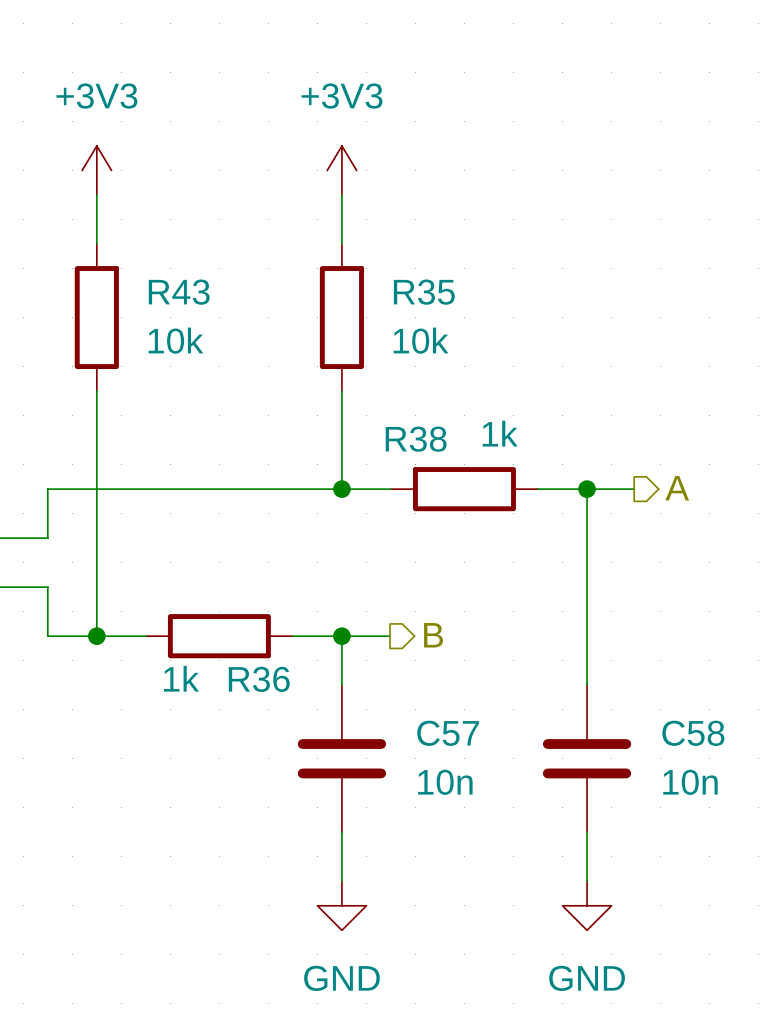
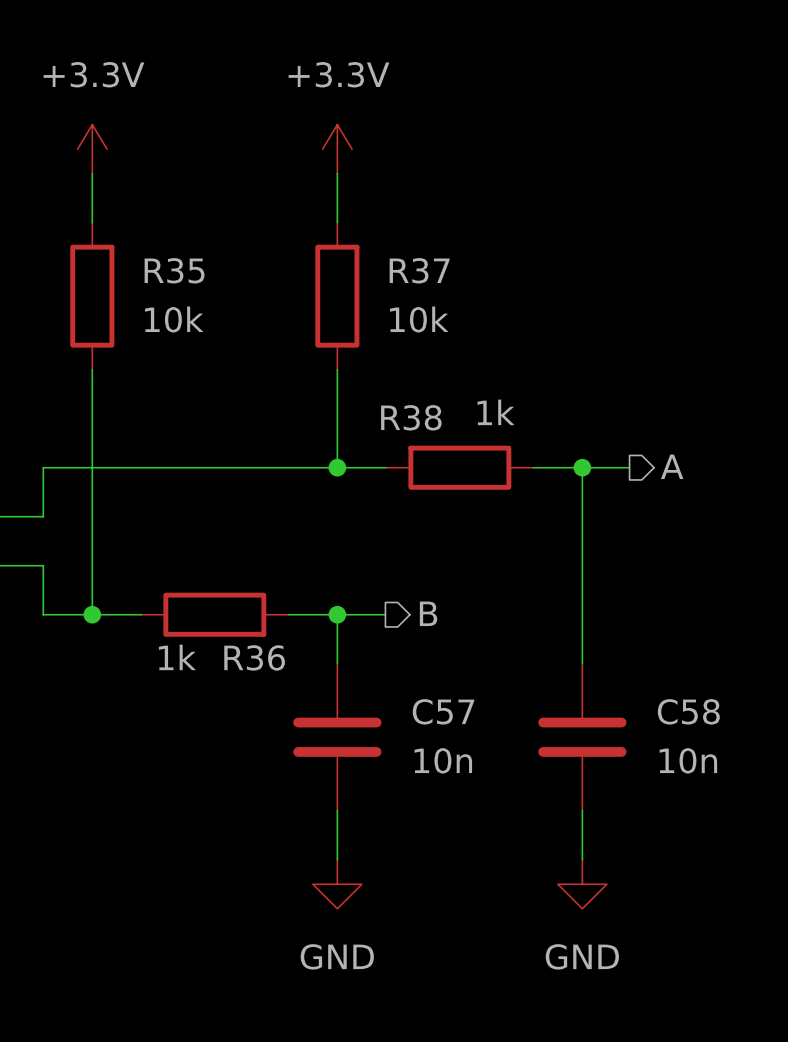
power symbol: +3V3 (96, 170) -> +3.3V (92, 149)
power symbol: +3V3 (341, 170) -> +3.3V (337, 149)
R43 name: R43 (179, 292) -> R35 (174, 270)
R35 name: R35 (424, 292) -> R37 (419, 270)

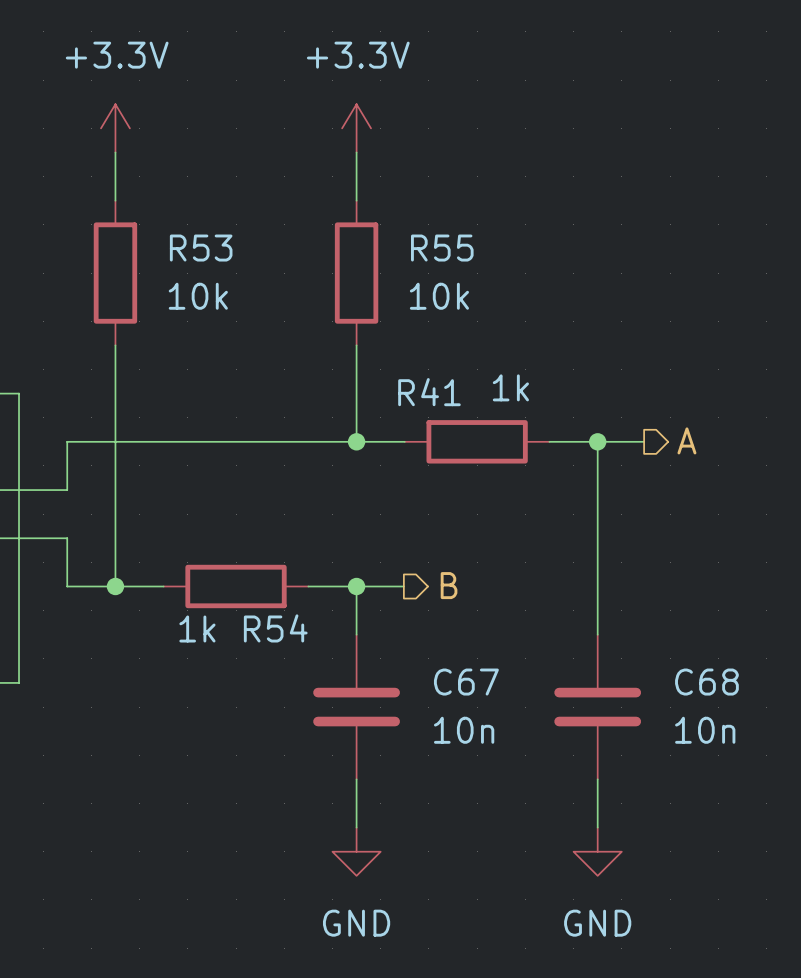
R35 name: R35 (174, 270) -> R53 (201, 248)
R37 name: R37 (419, 270) -> R55 (442, 248)
R38 name: R38 (411, 417) -> R41 (429, 392)
R36 name: R36 (254, 657) -> R54 (275, 628)
C57 name: C57 (443, 711) -> C67 (466, 682)
C58 name: C58 (688, 711) -> C68 (706, 682)

